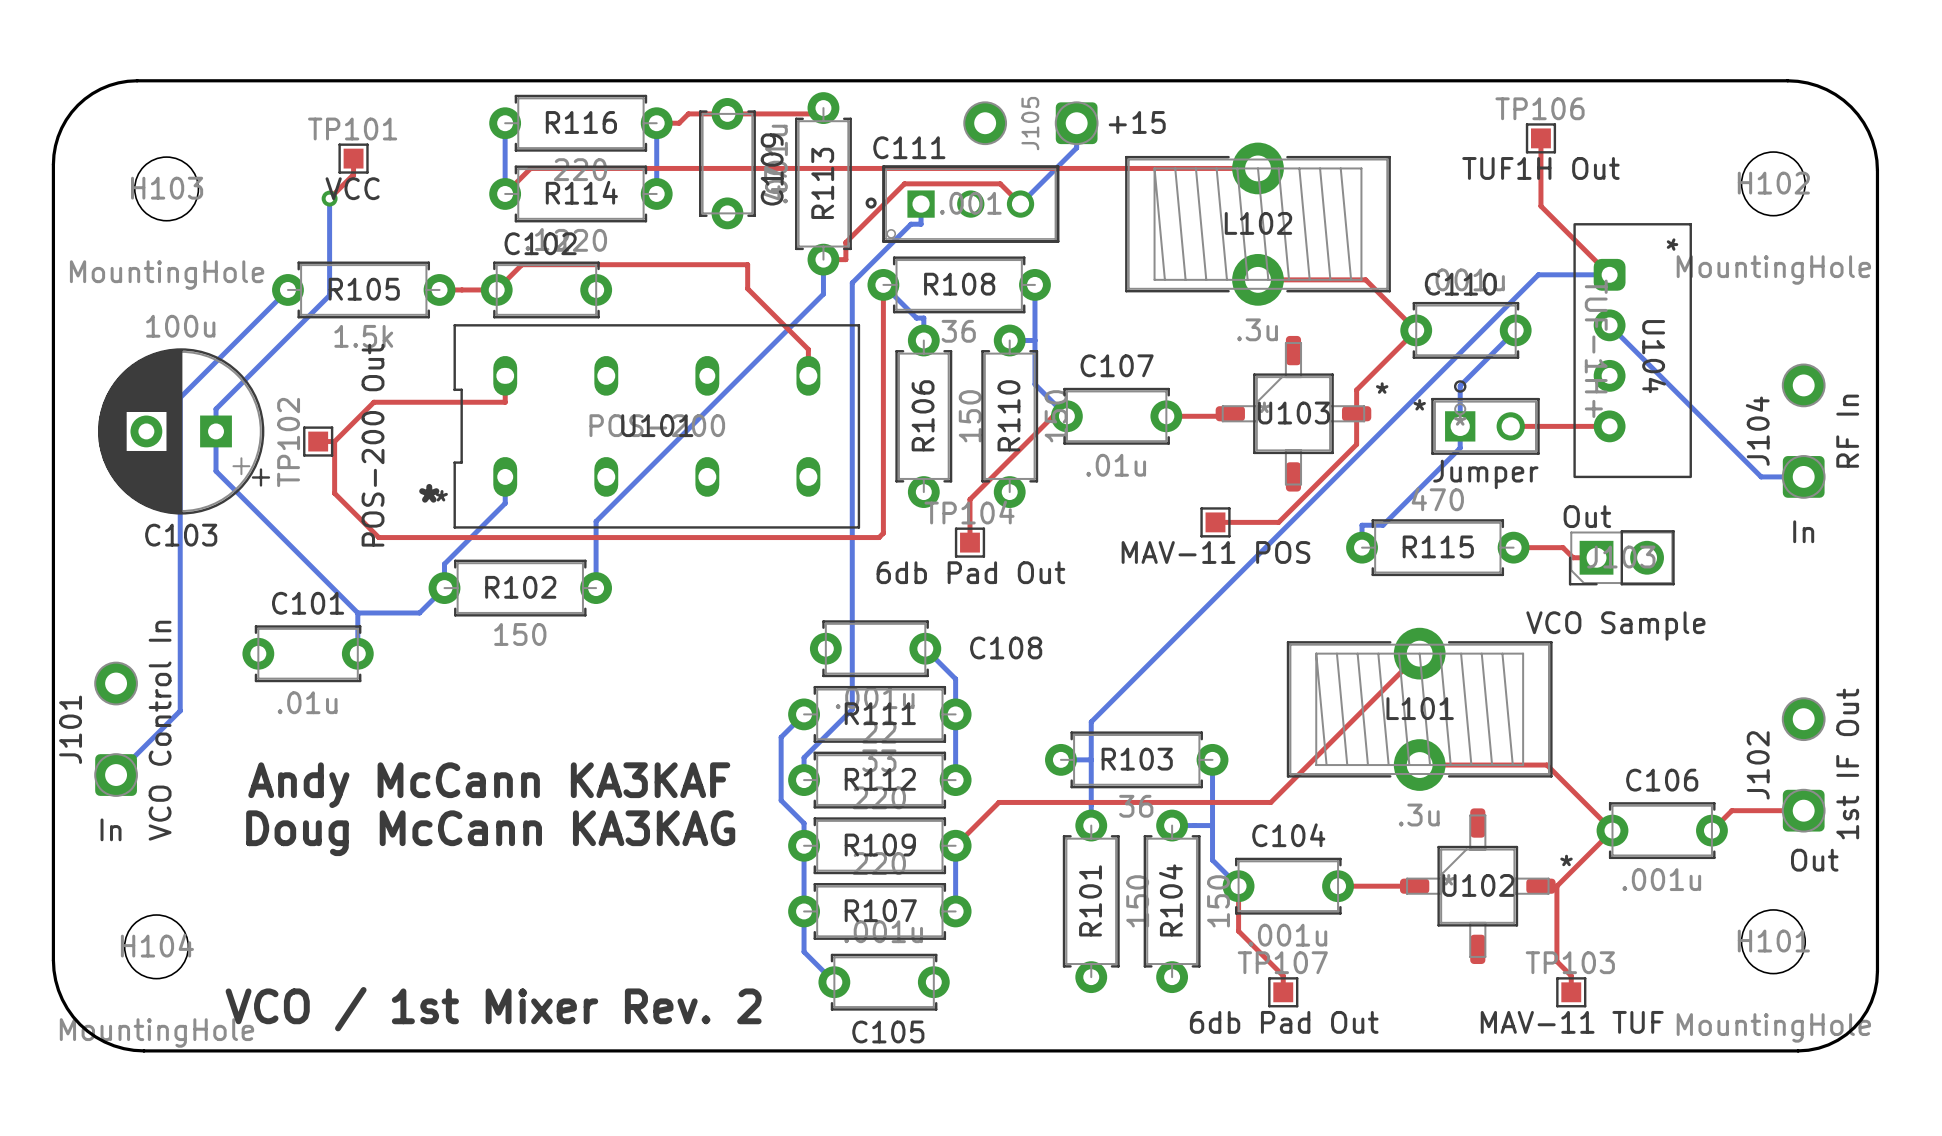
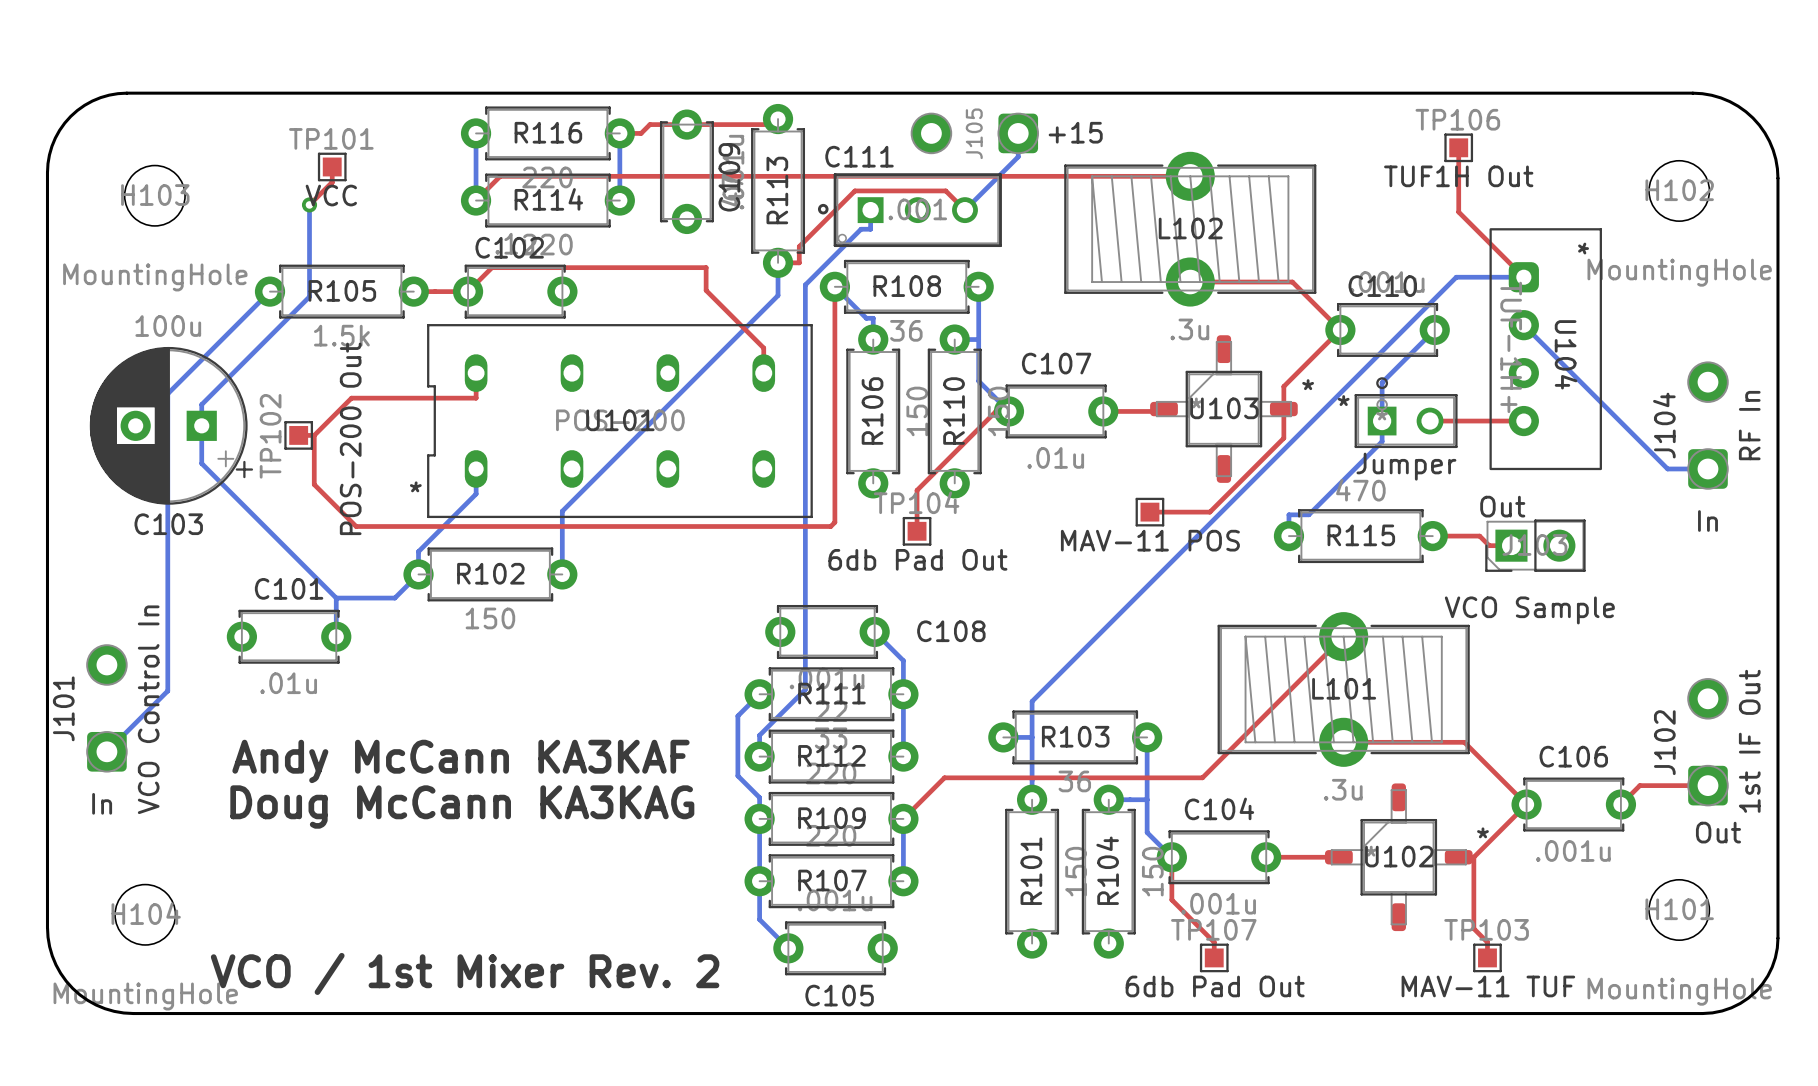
text: * (429, 493) -> none

